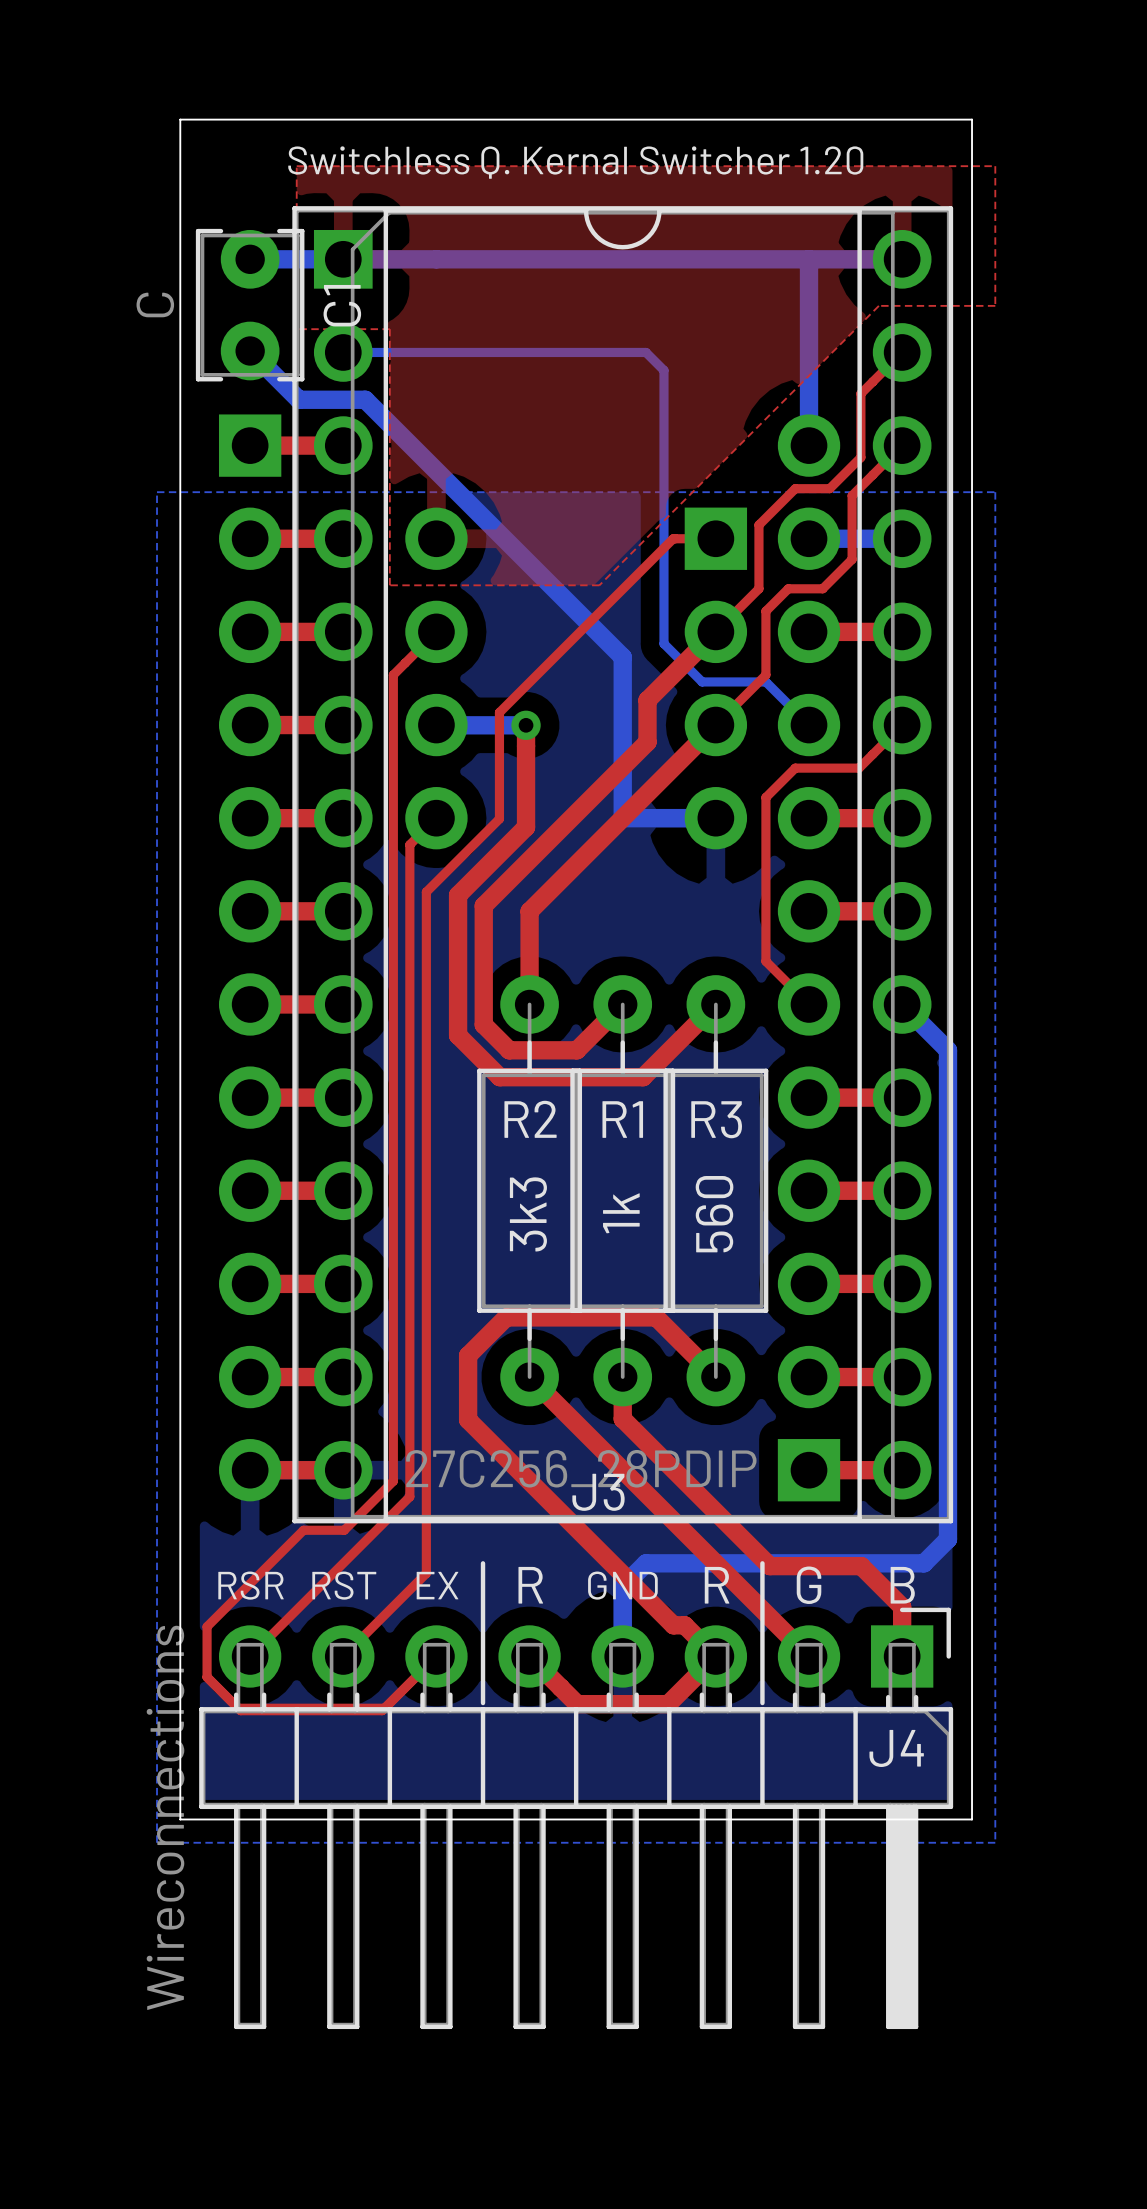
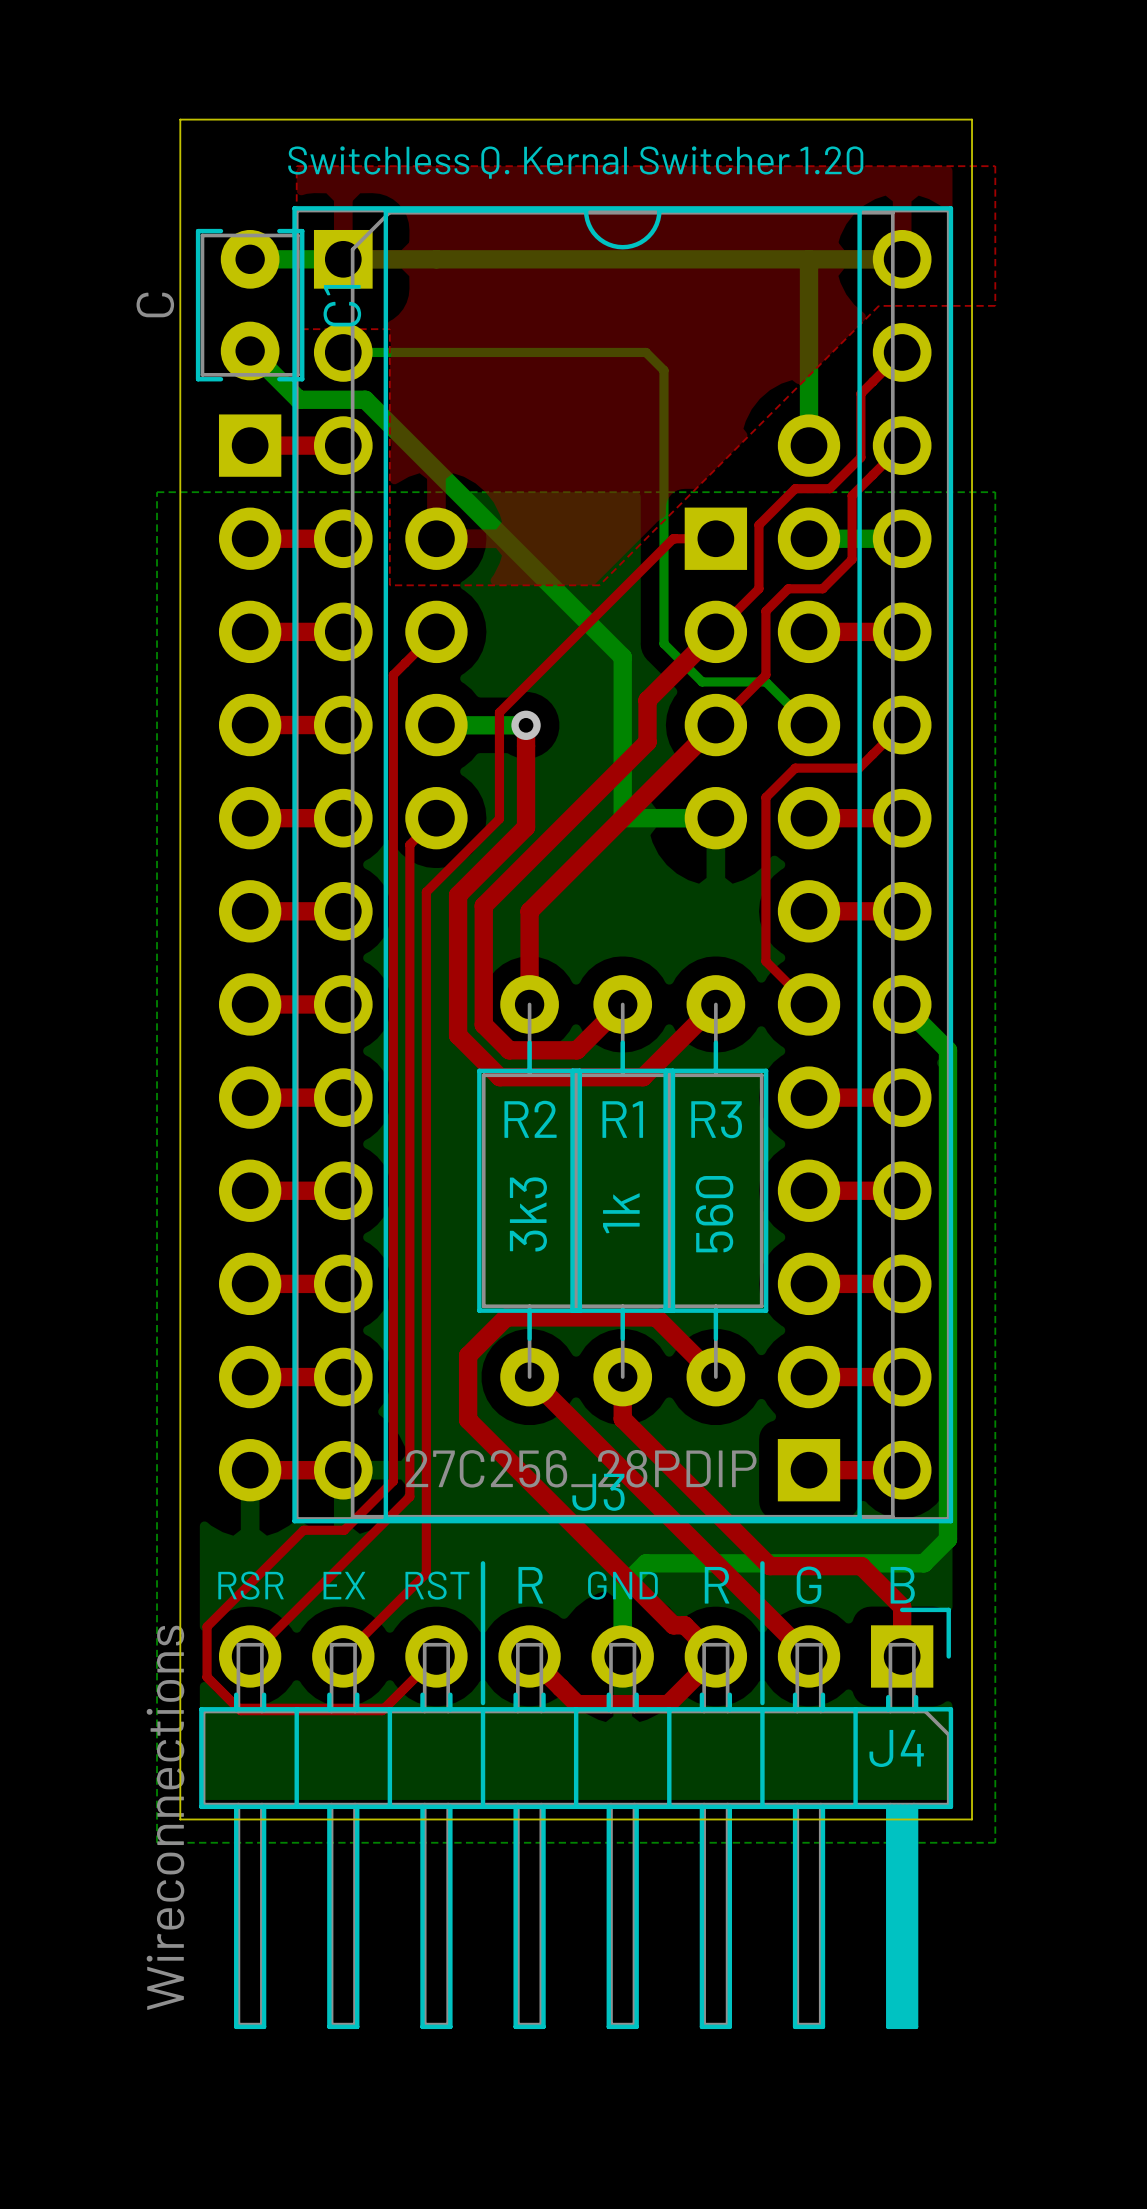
text: RST (344, 1585) -> EX (344, 1585)
text: EX (437, 1585) -> RST (437, 1585)

